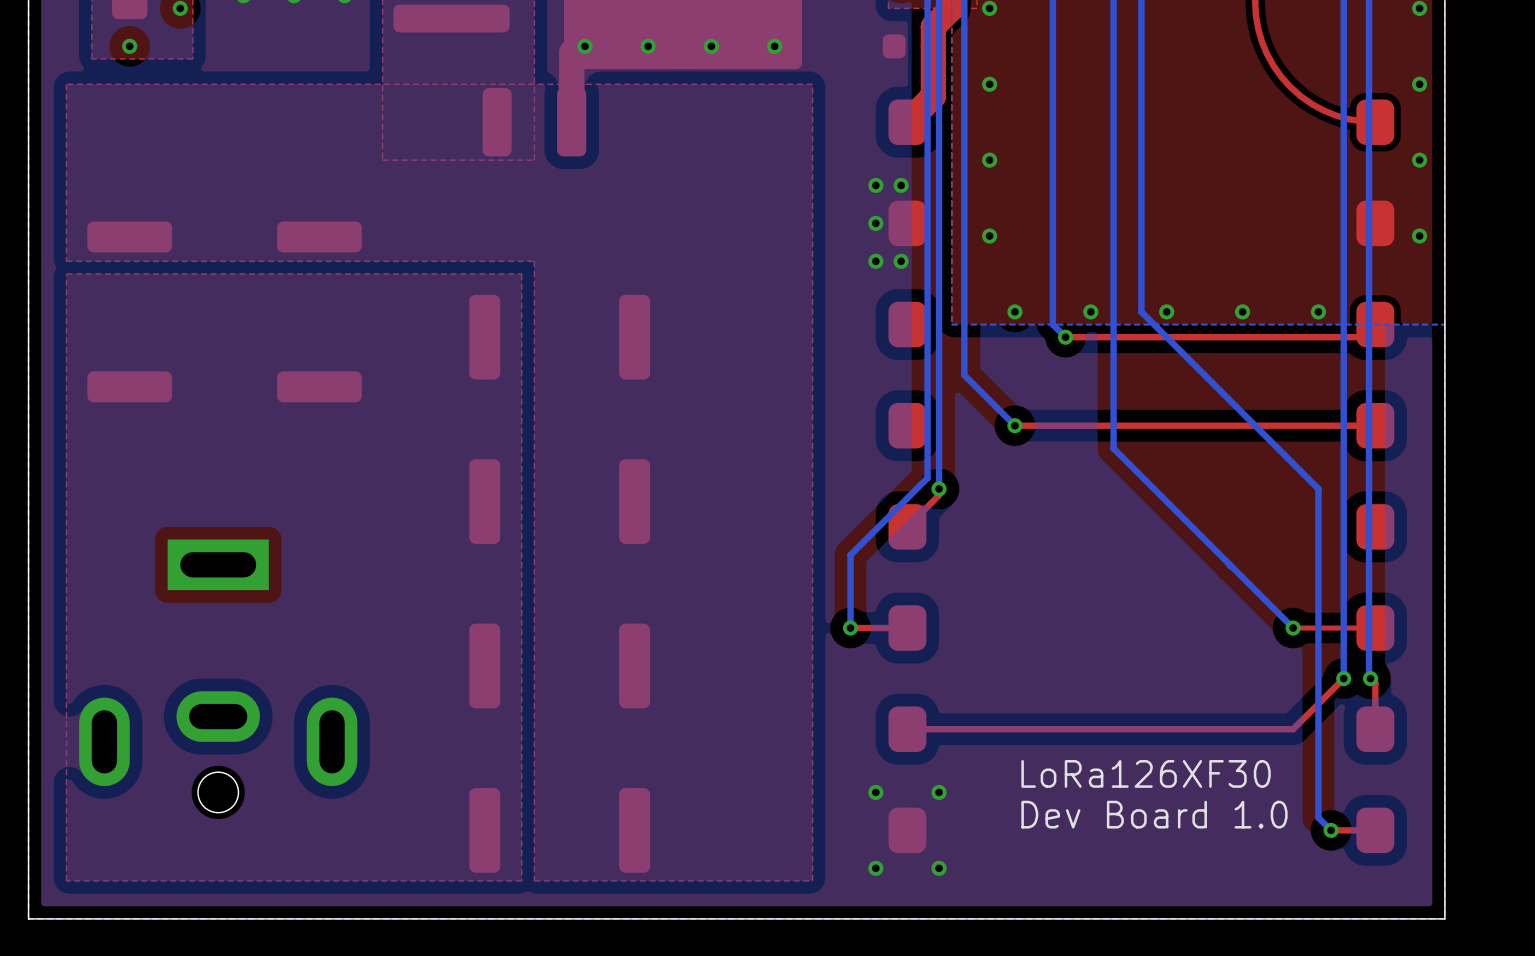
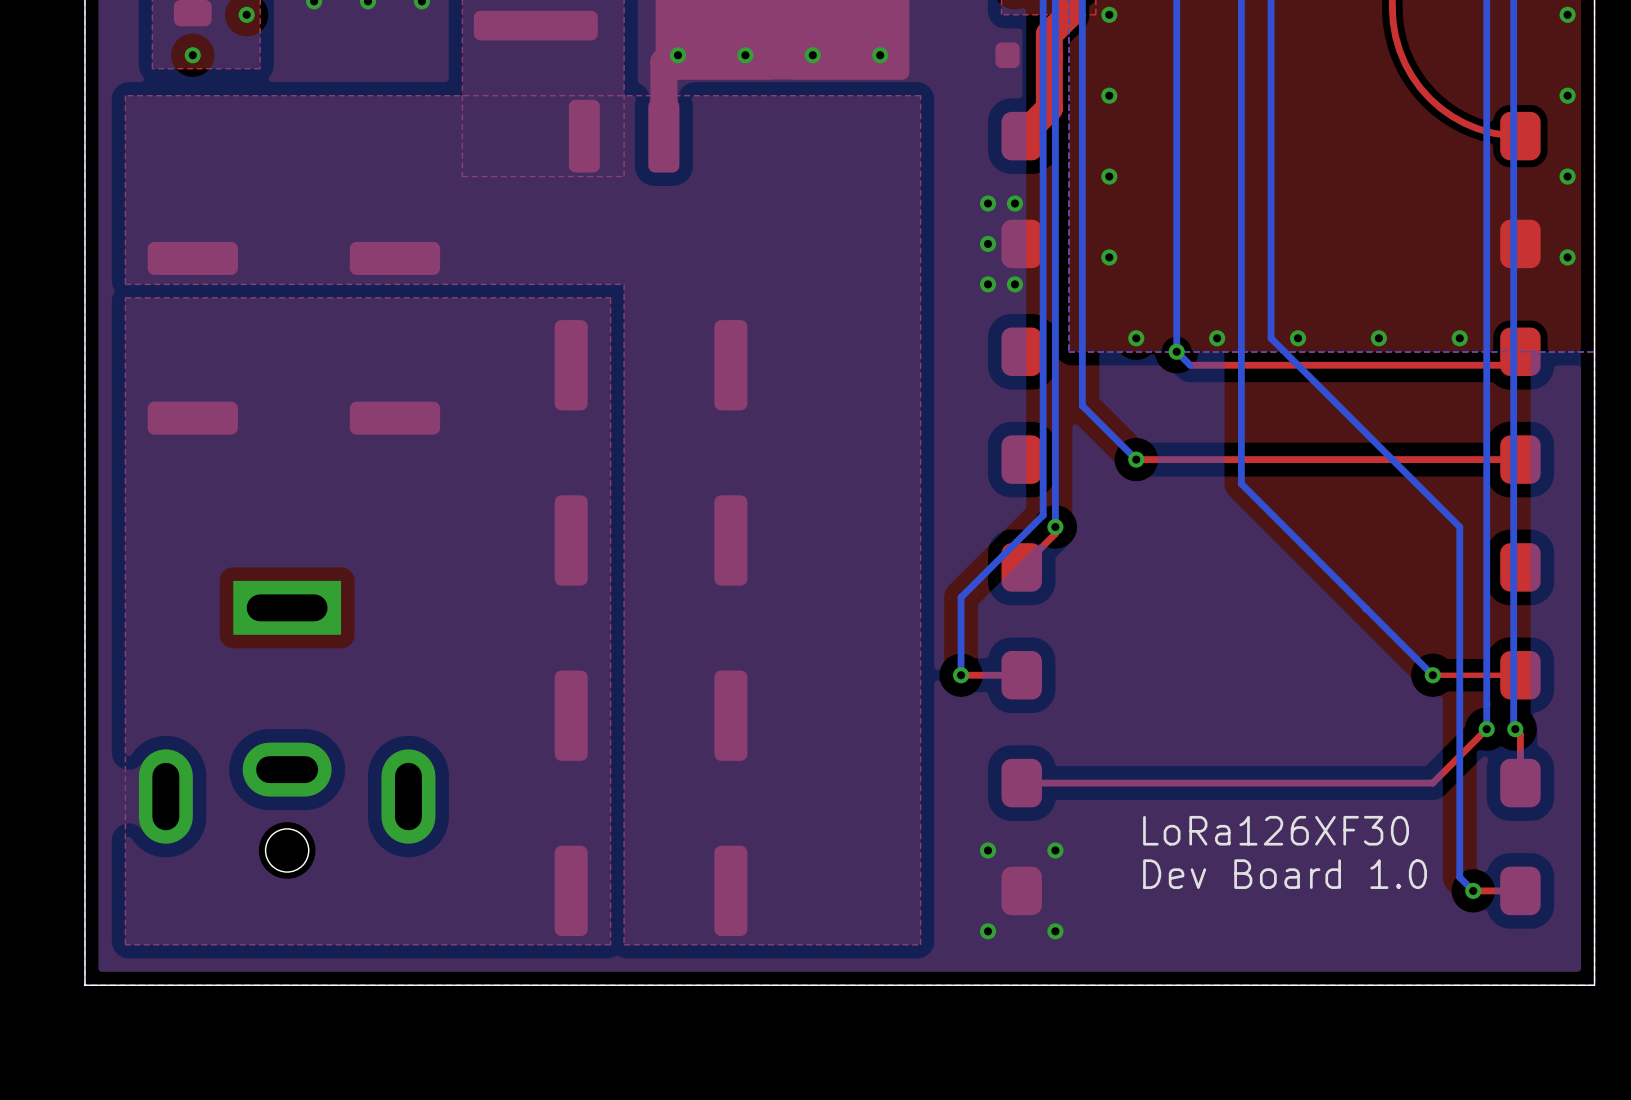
via position: (1065, 337) -> (1176, 351)

